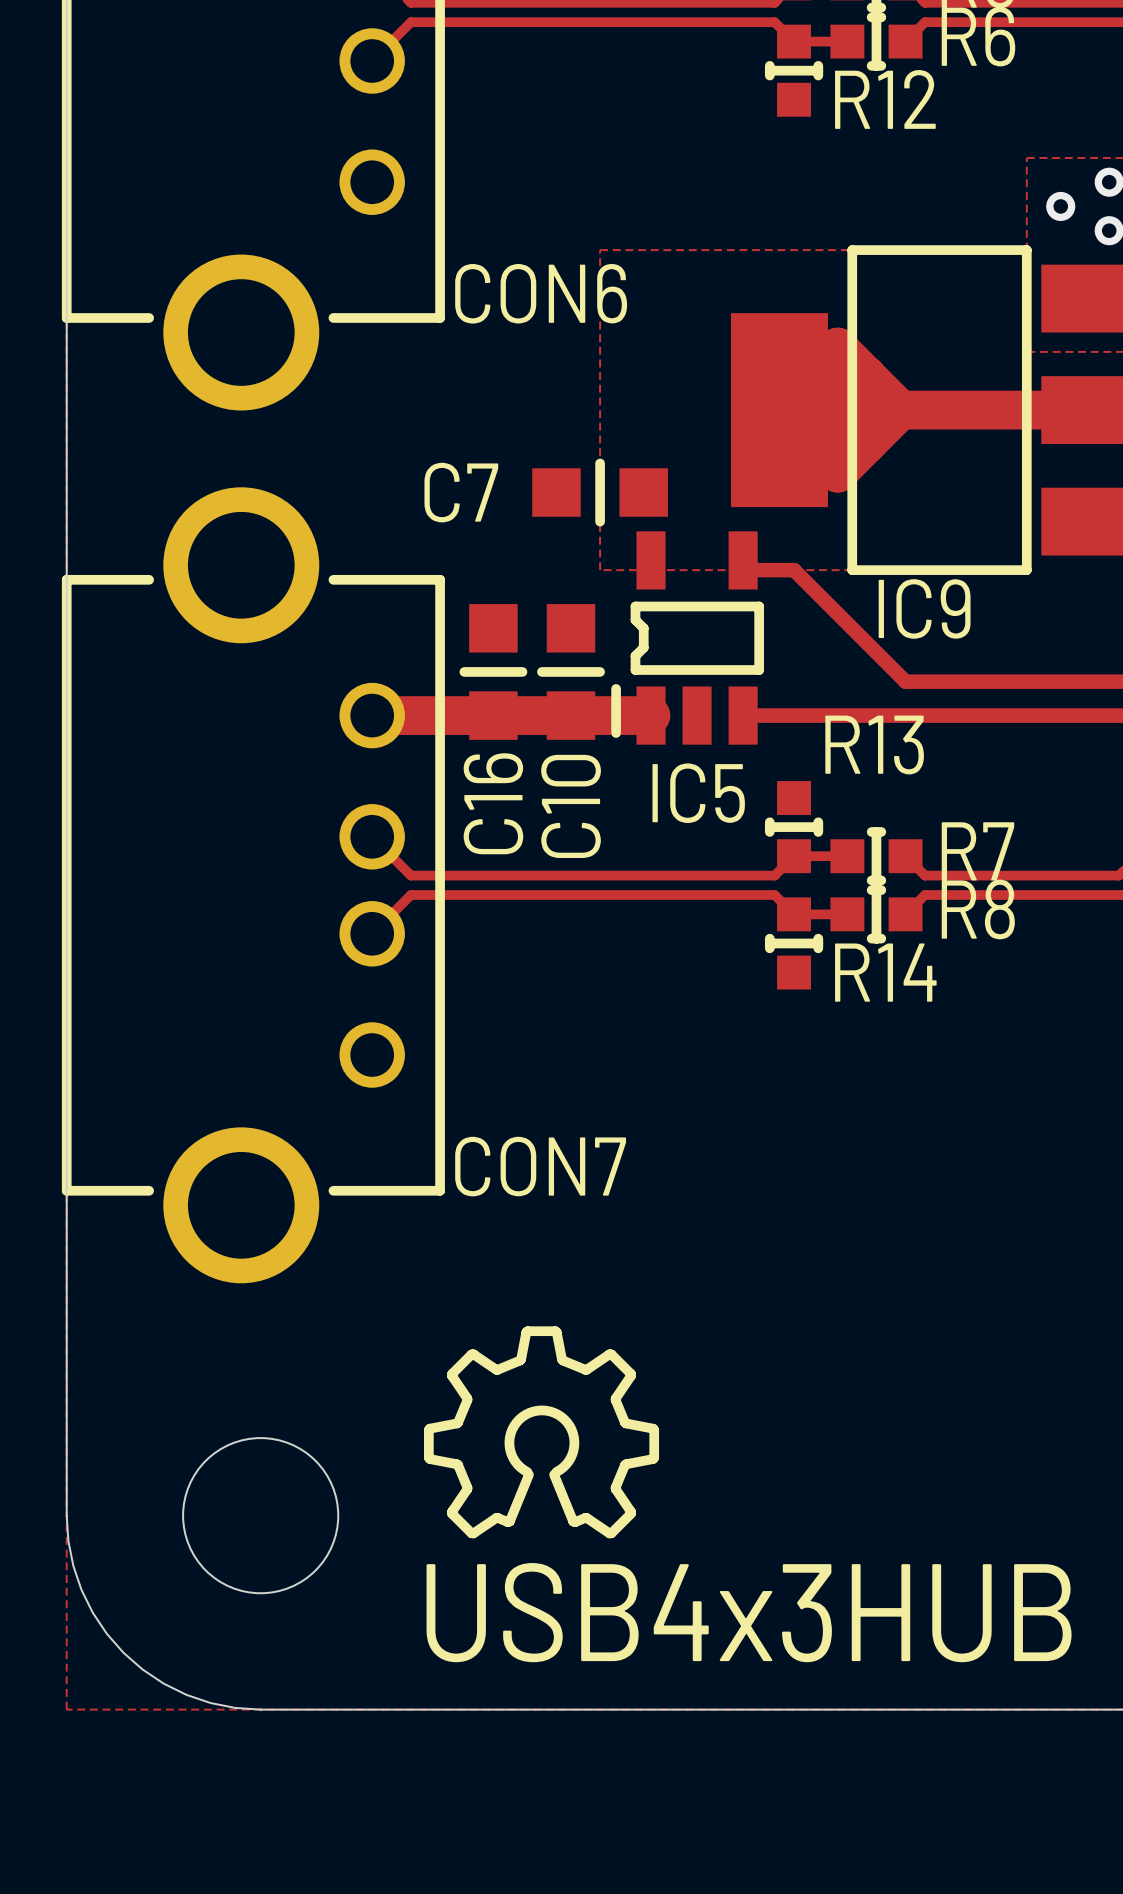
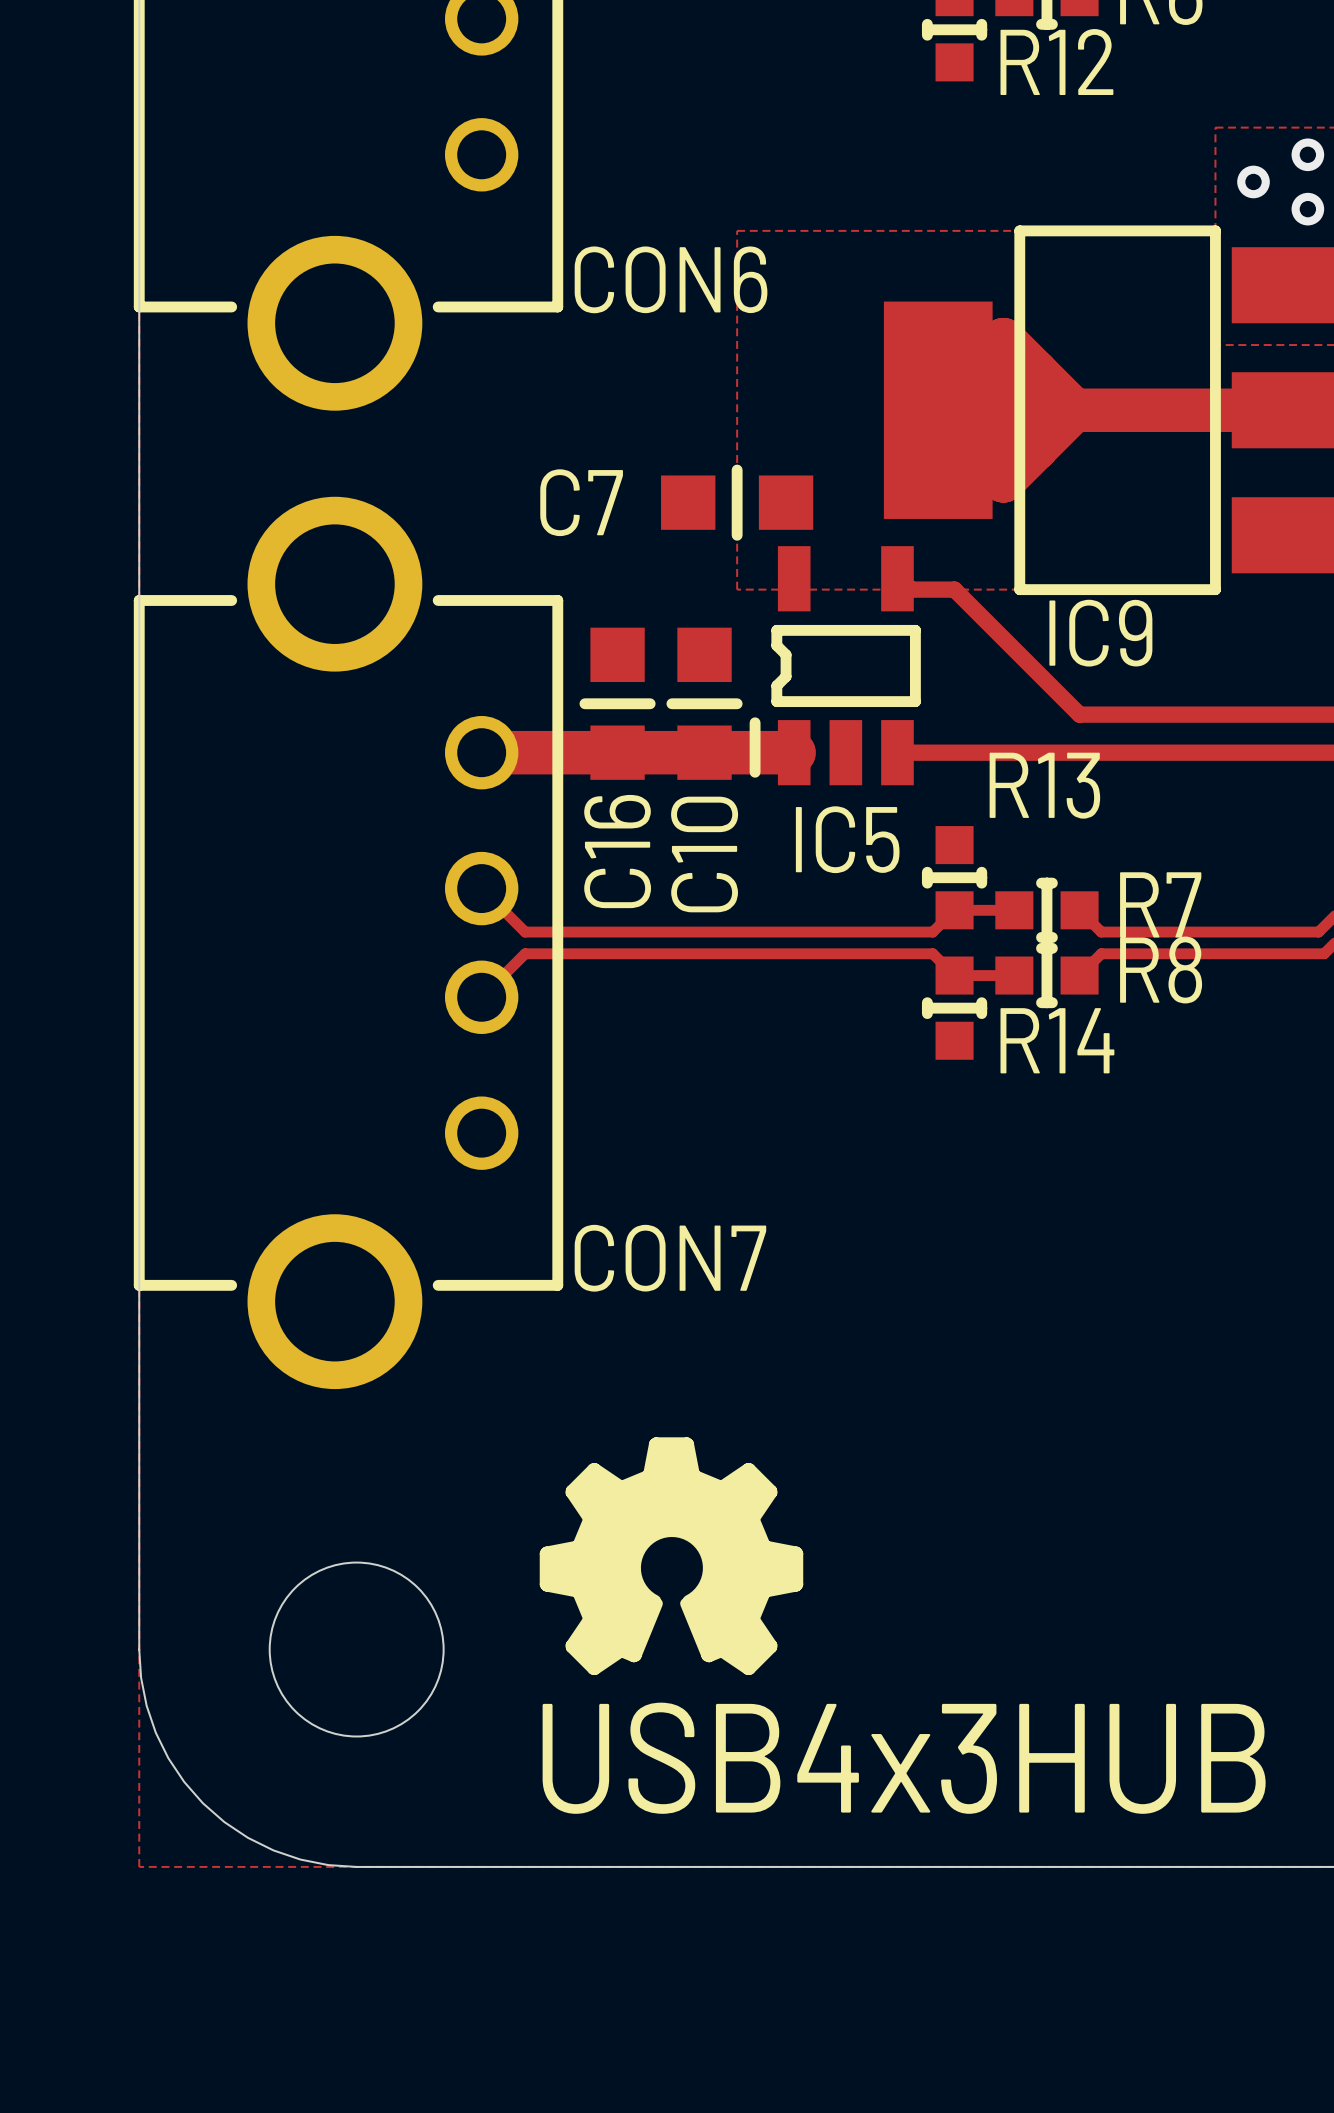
drawing shape: [424, 1326, 660, 1539] -> [539, 1437, 804, 1675]

